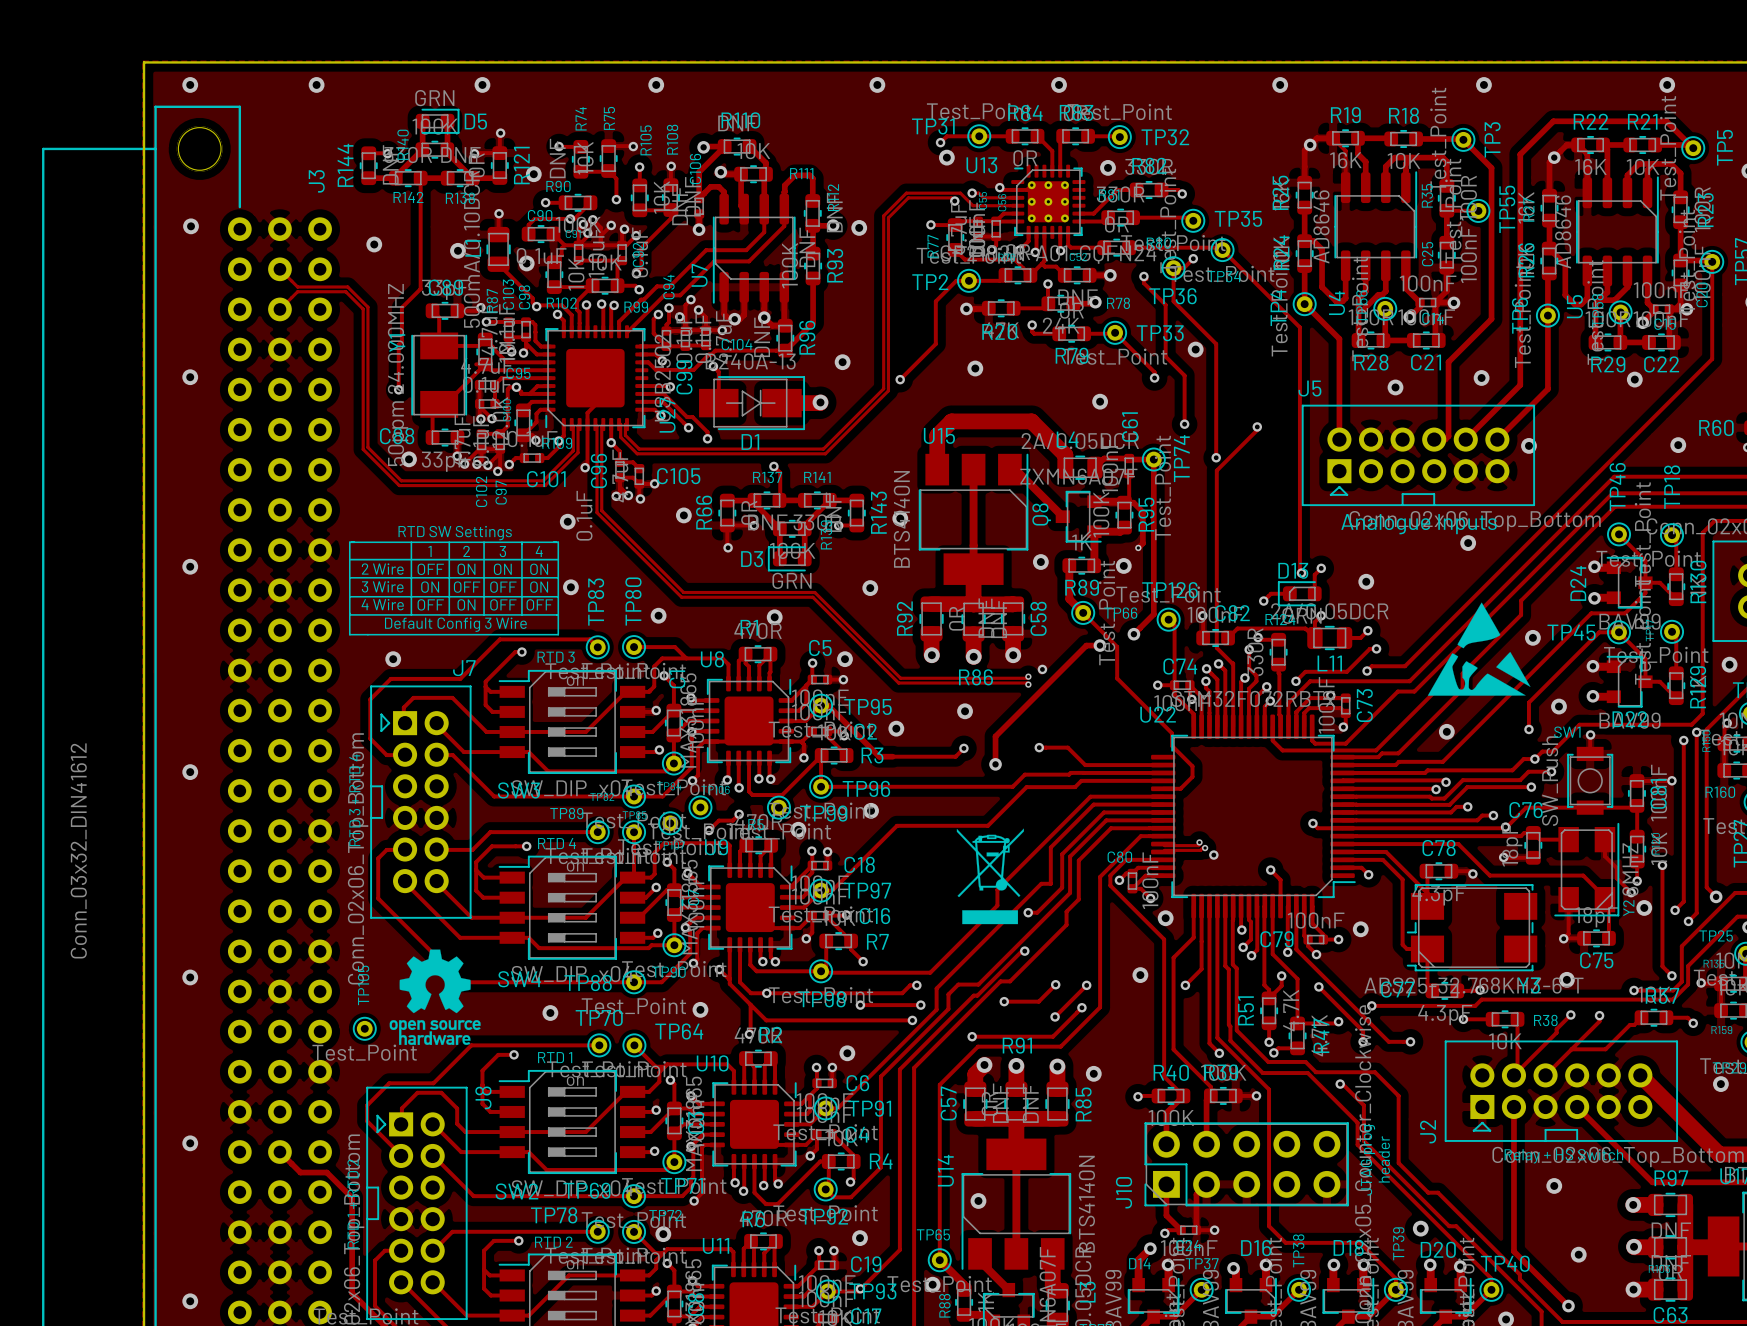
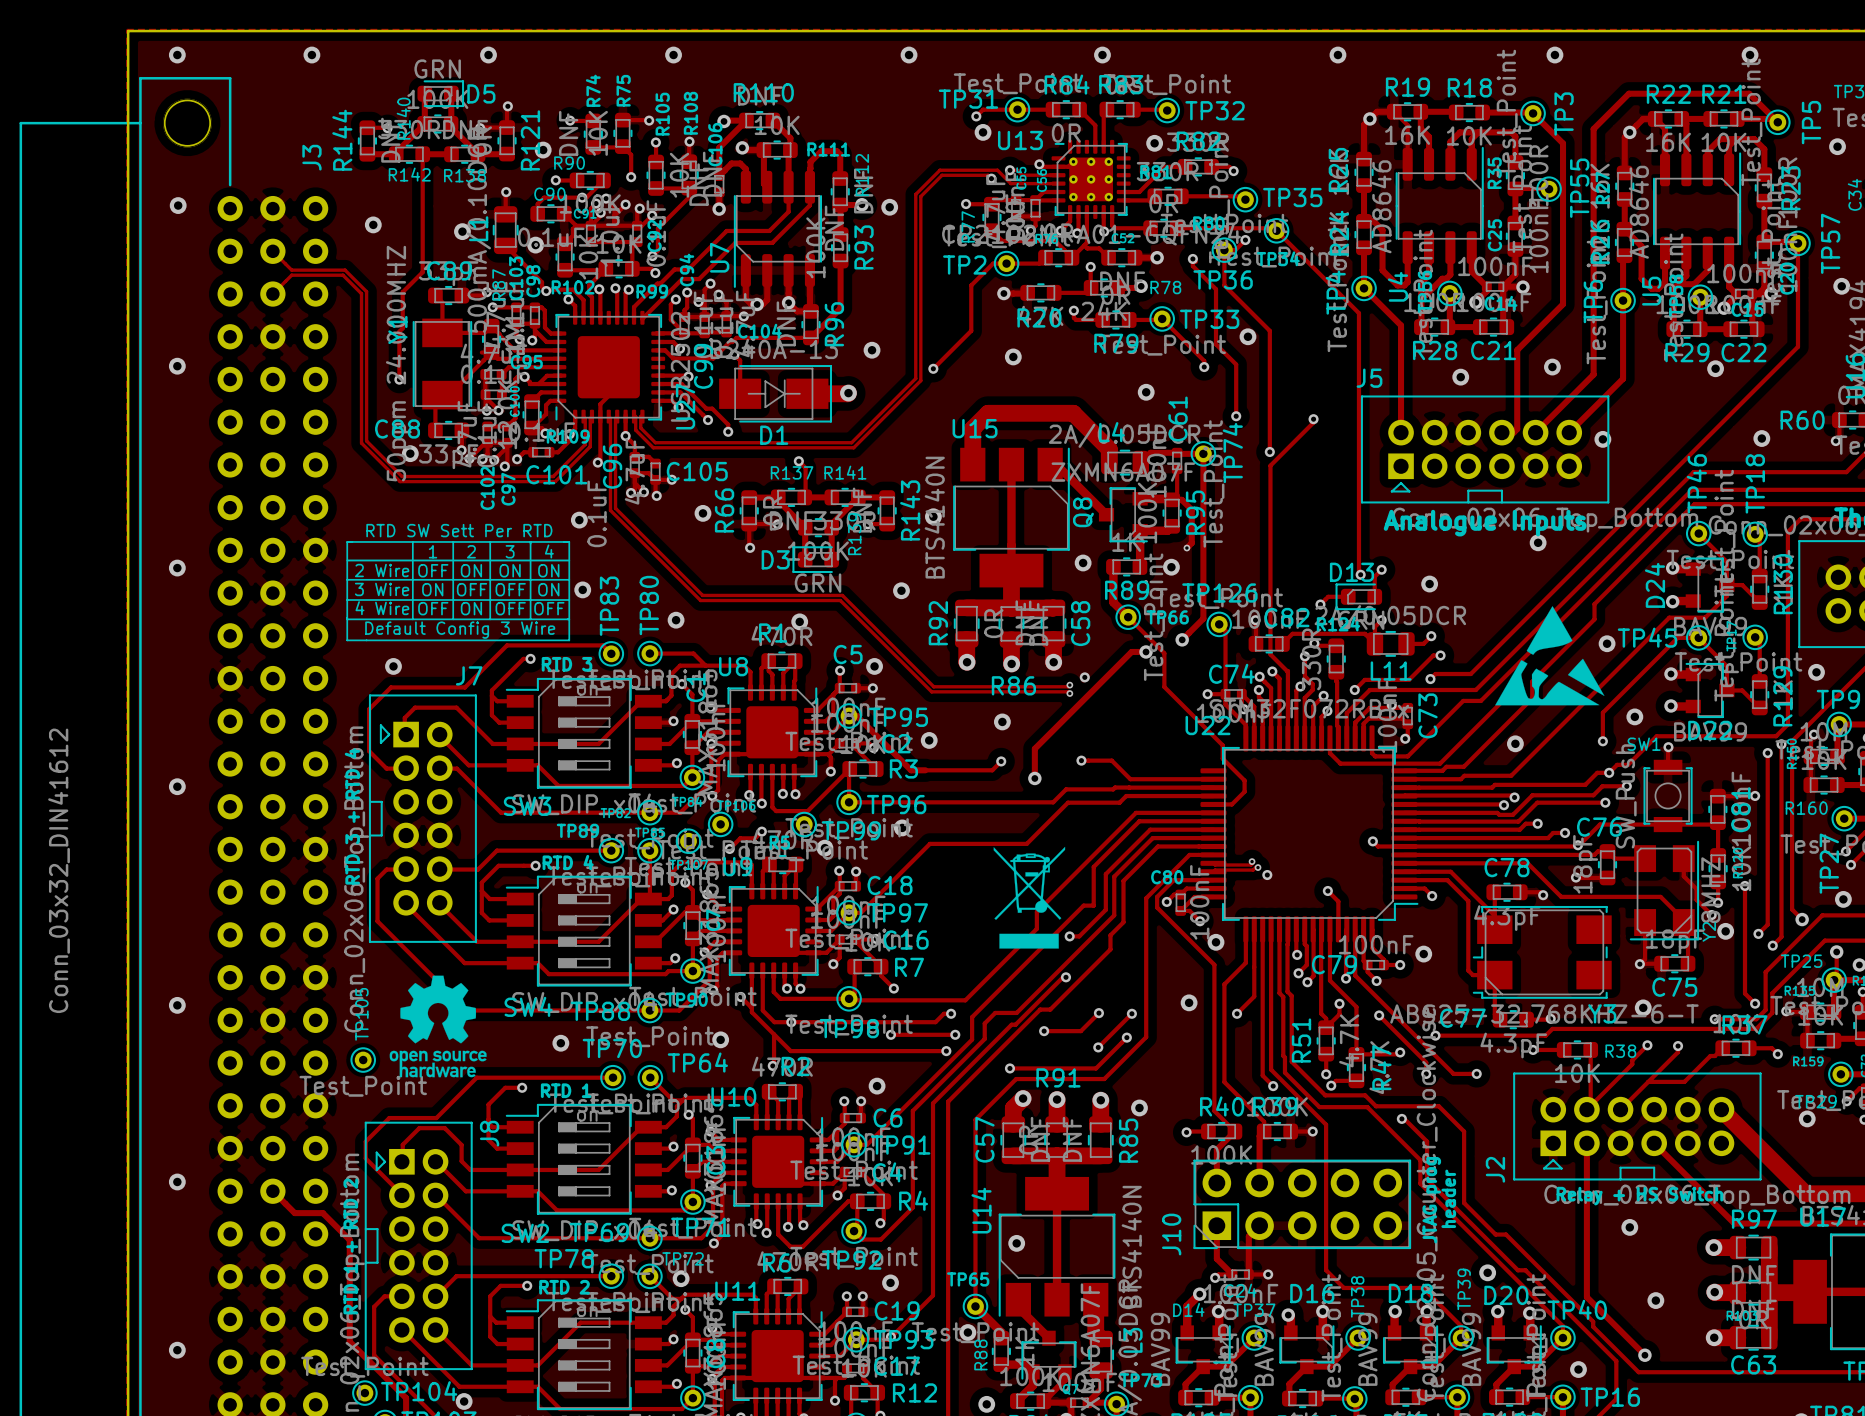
text: RTD SW Settings (455, 533) -> RTD SW Sett Per RTD (459, 530)

